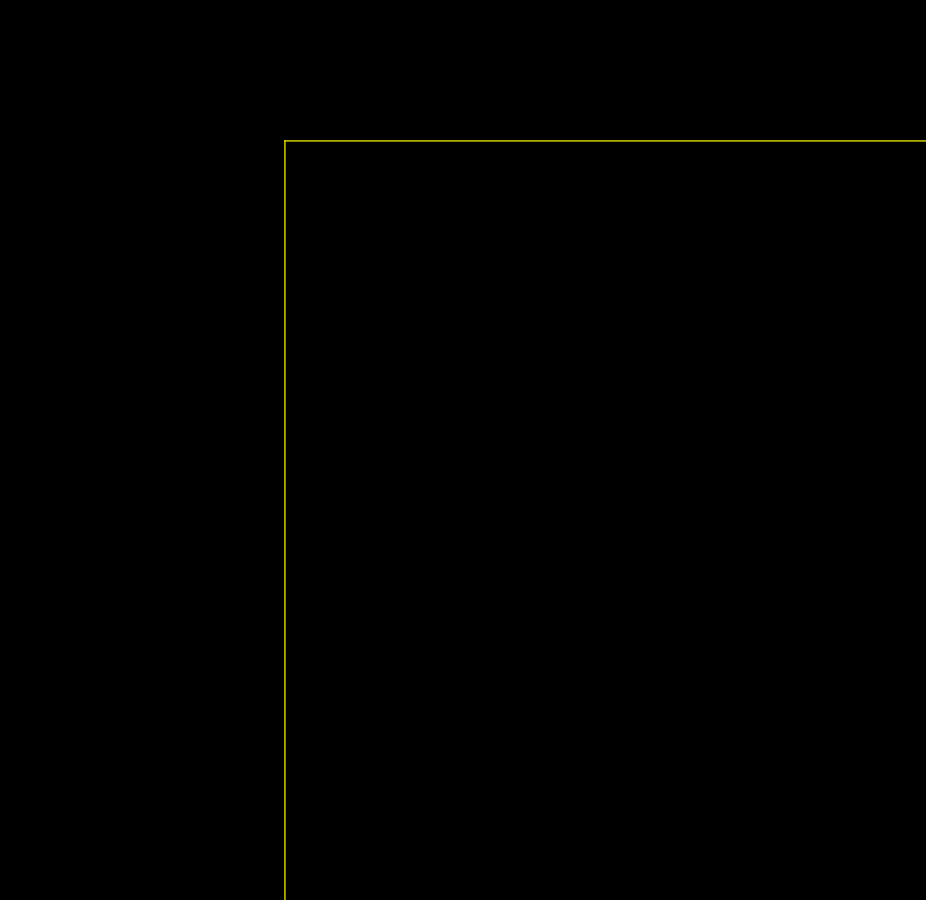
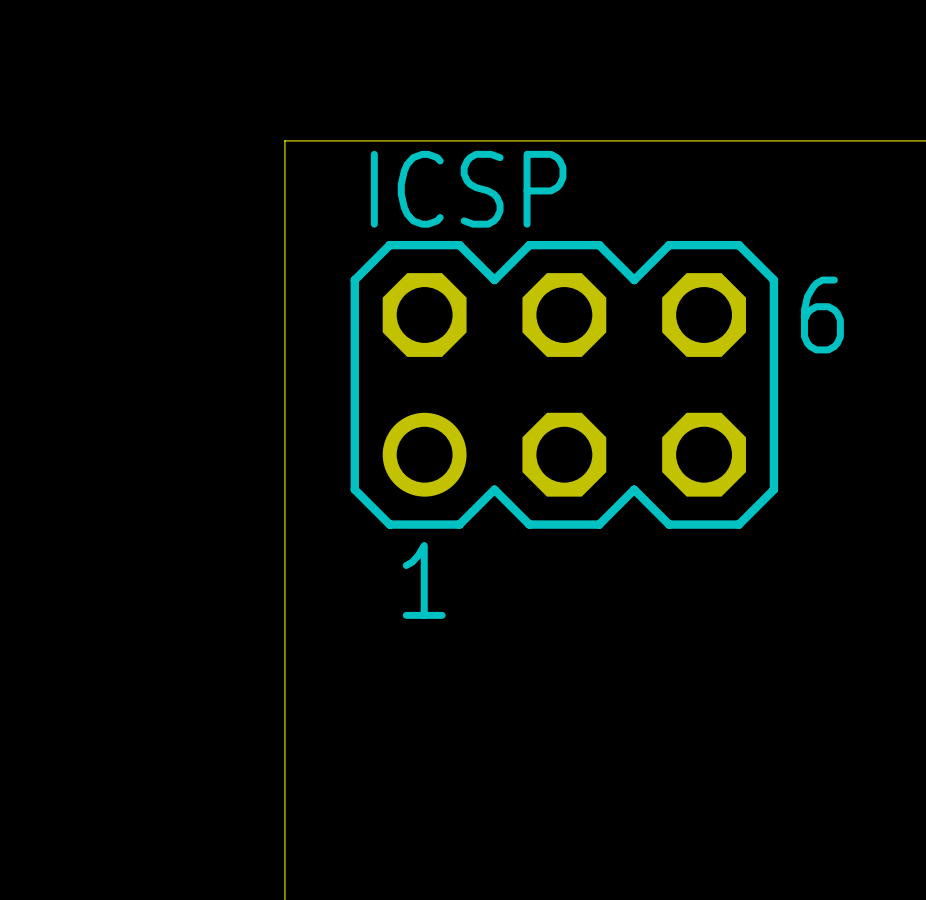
ICSP: none -> (564, 384)

